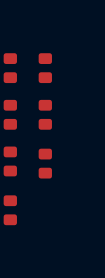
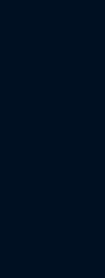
part: (10, 68) -> none
part: (45, 68) -> none
part: (10, 114) -> none
part: (45, 114) -> none
part: (10, 161) -> none
part: (45, 163) -> none
part: (10, 210) -> none

